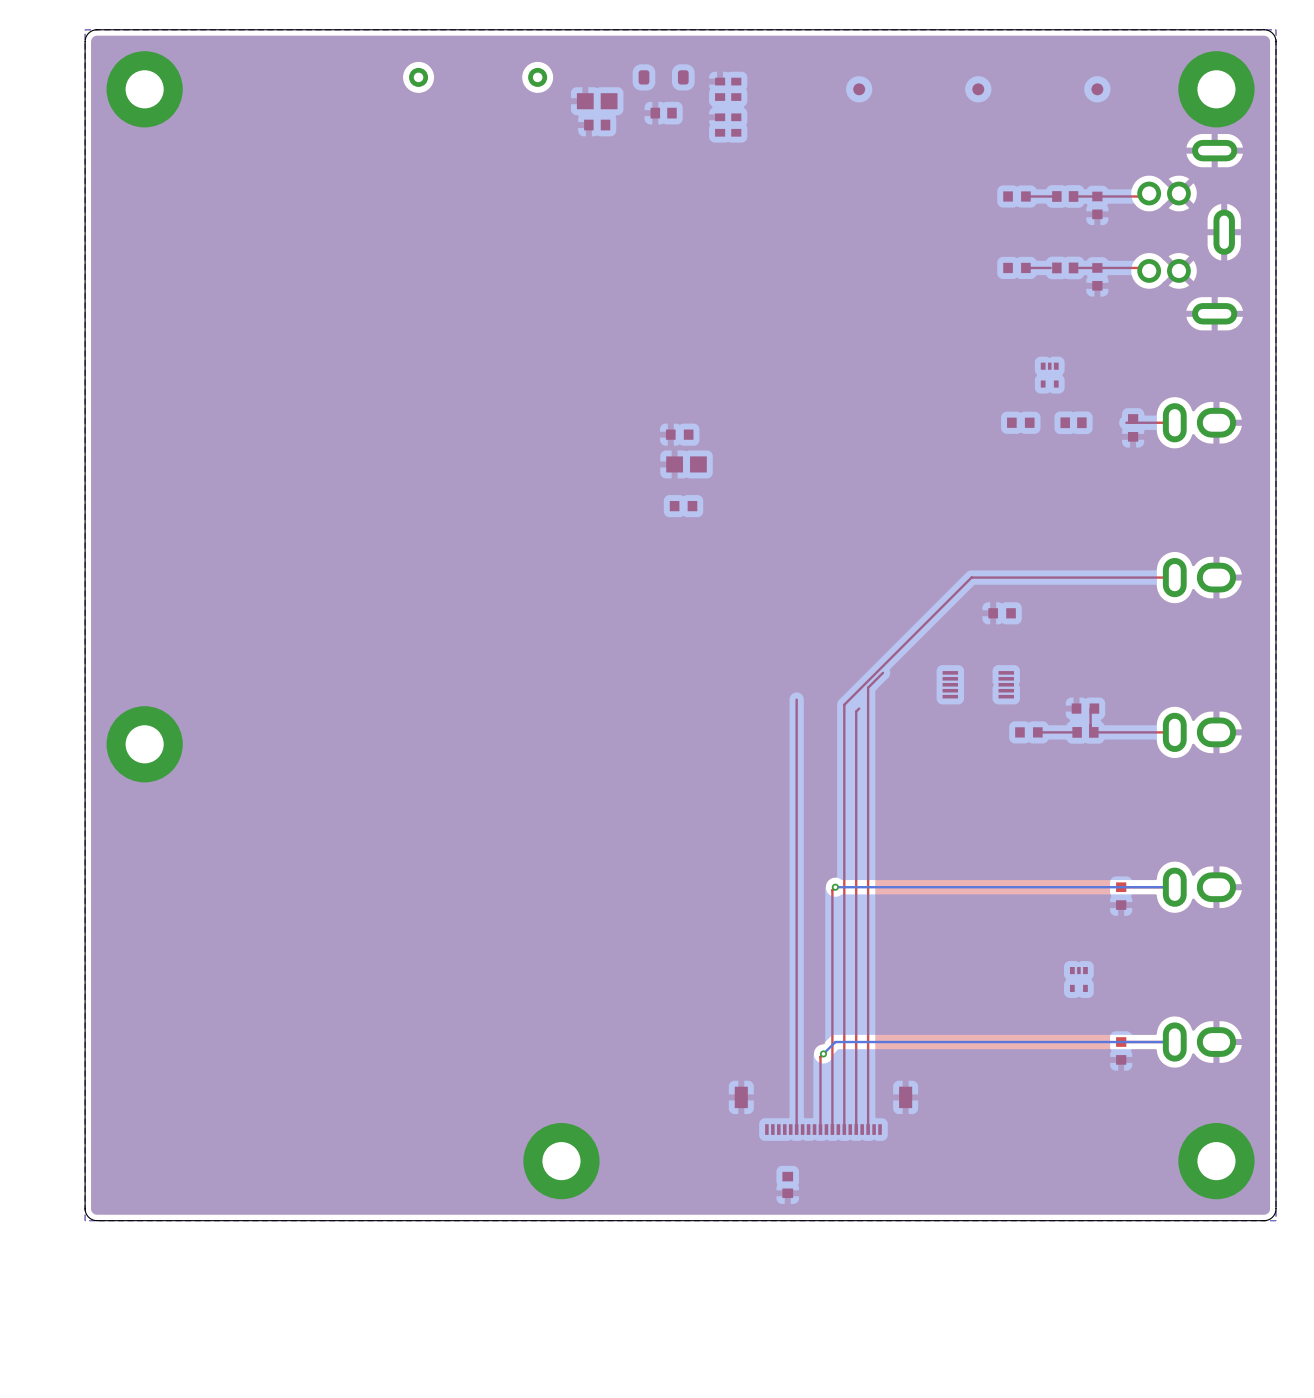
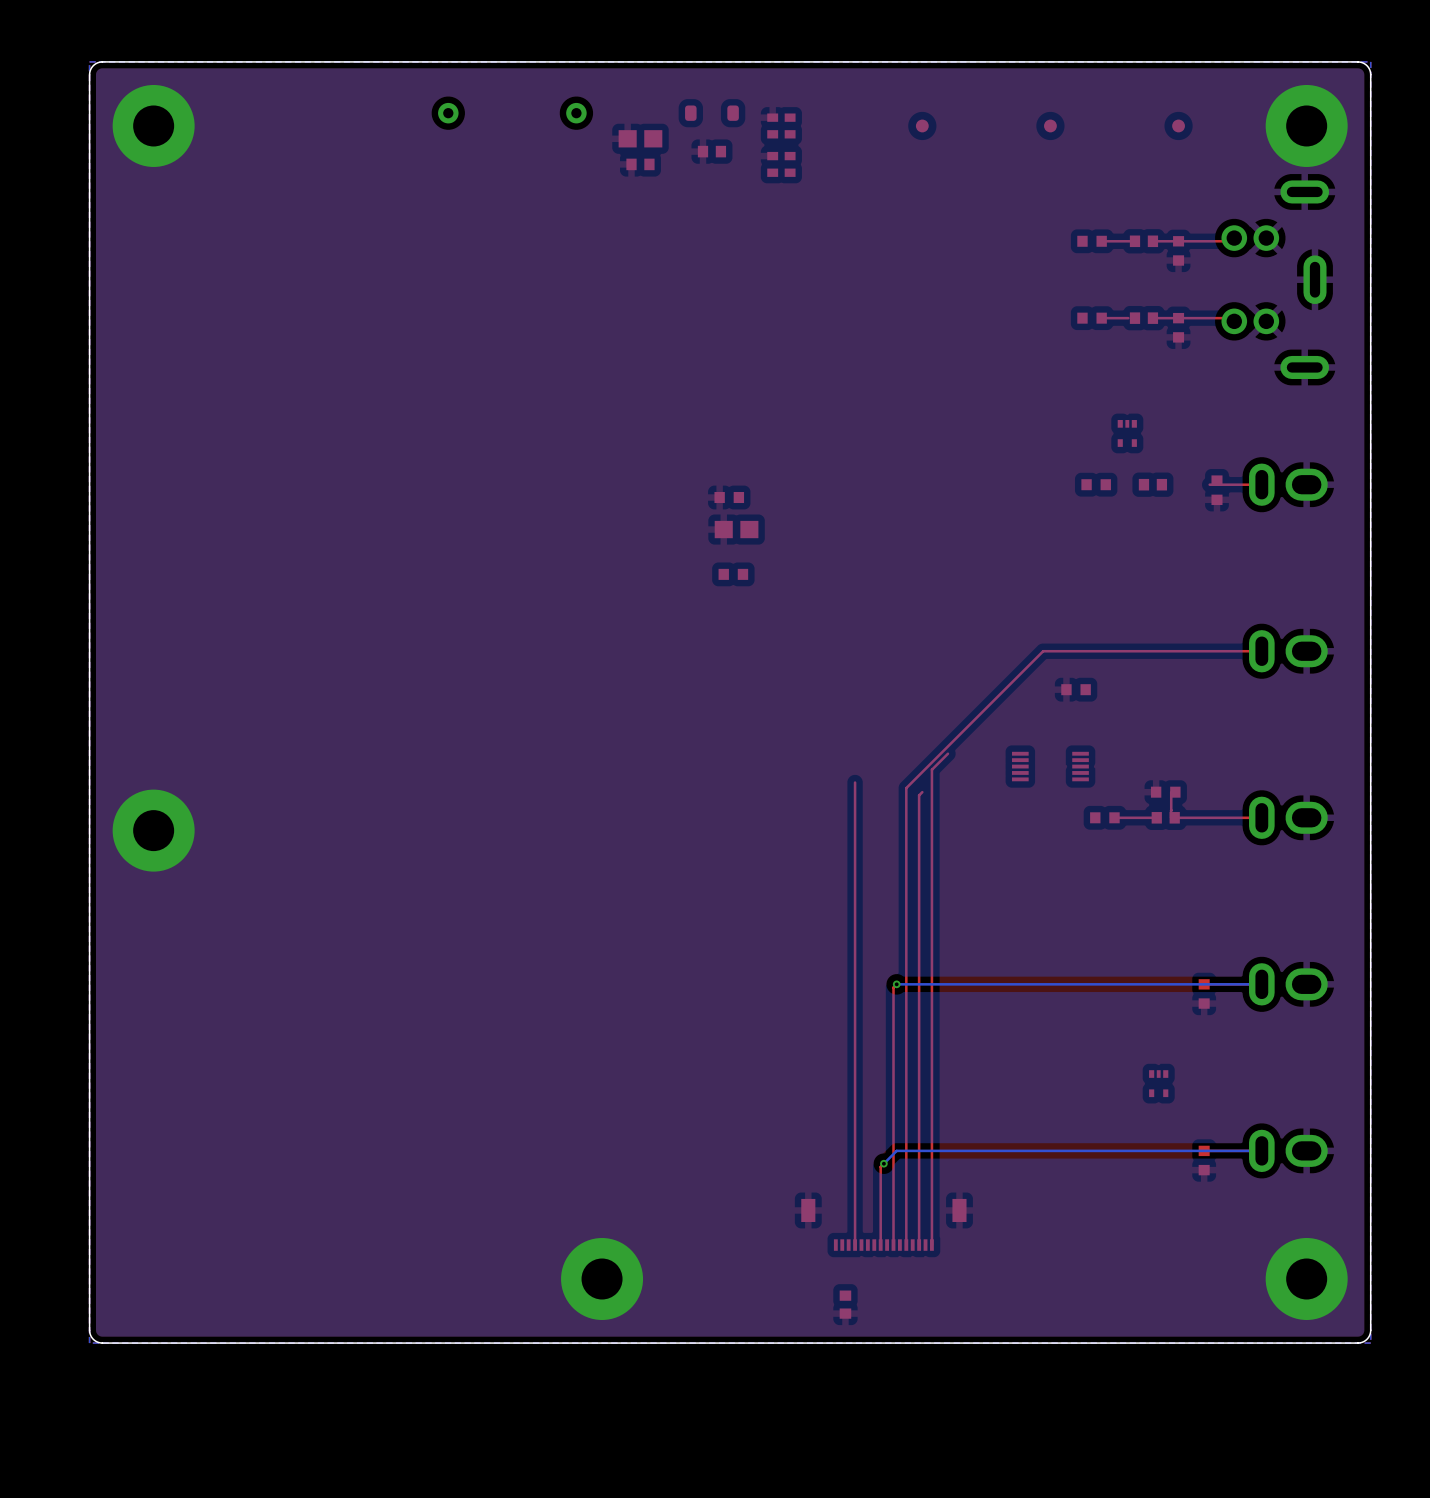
part footprint: [734, 1086, 913, 1135] -> [801, 1198, 967, 1251]

